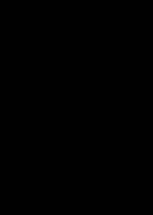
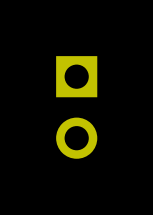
part: none -> (76, 107)

